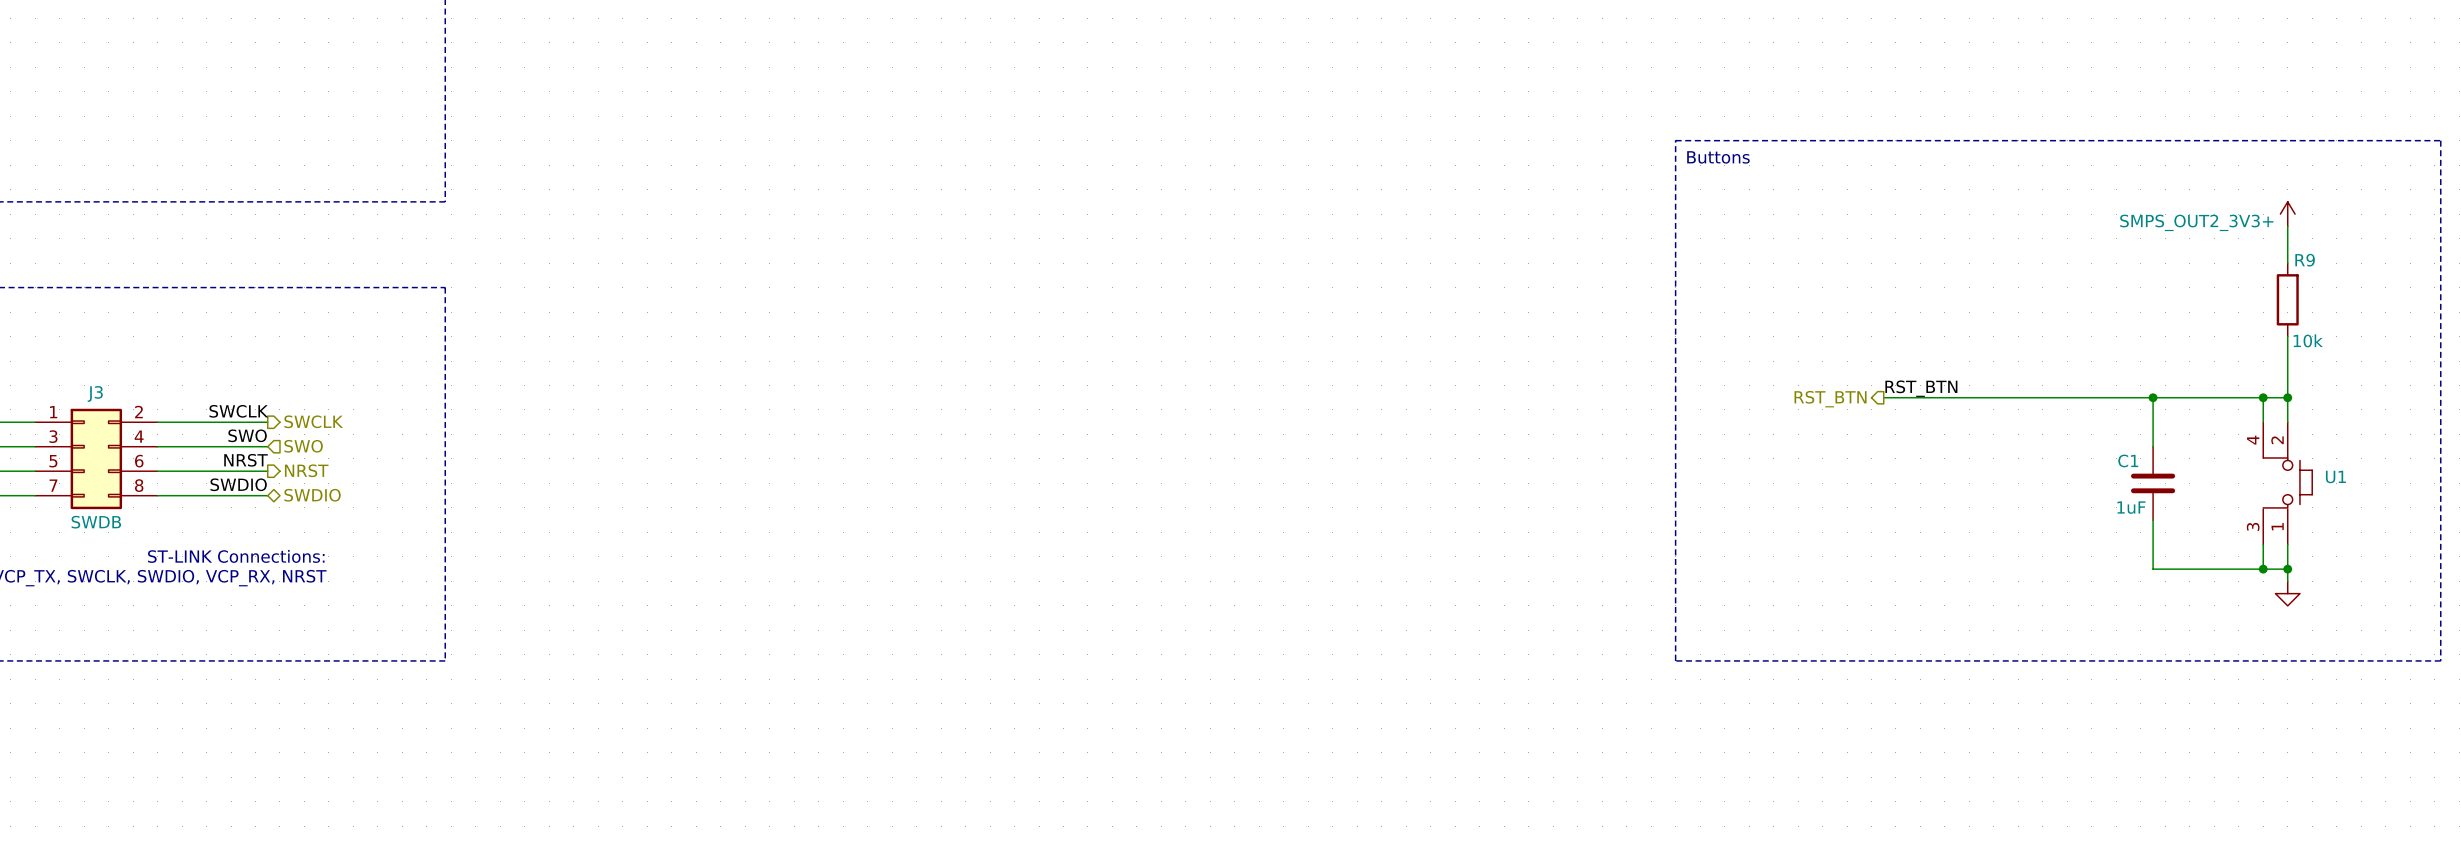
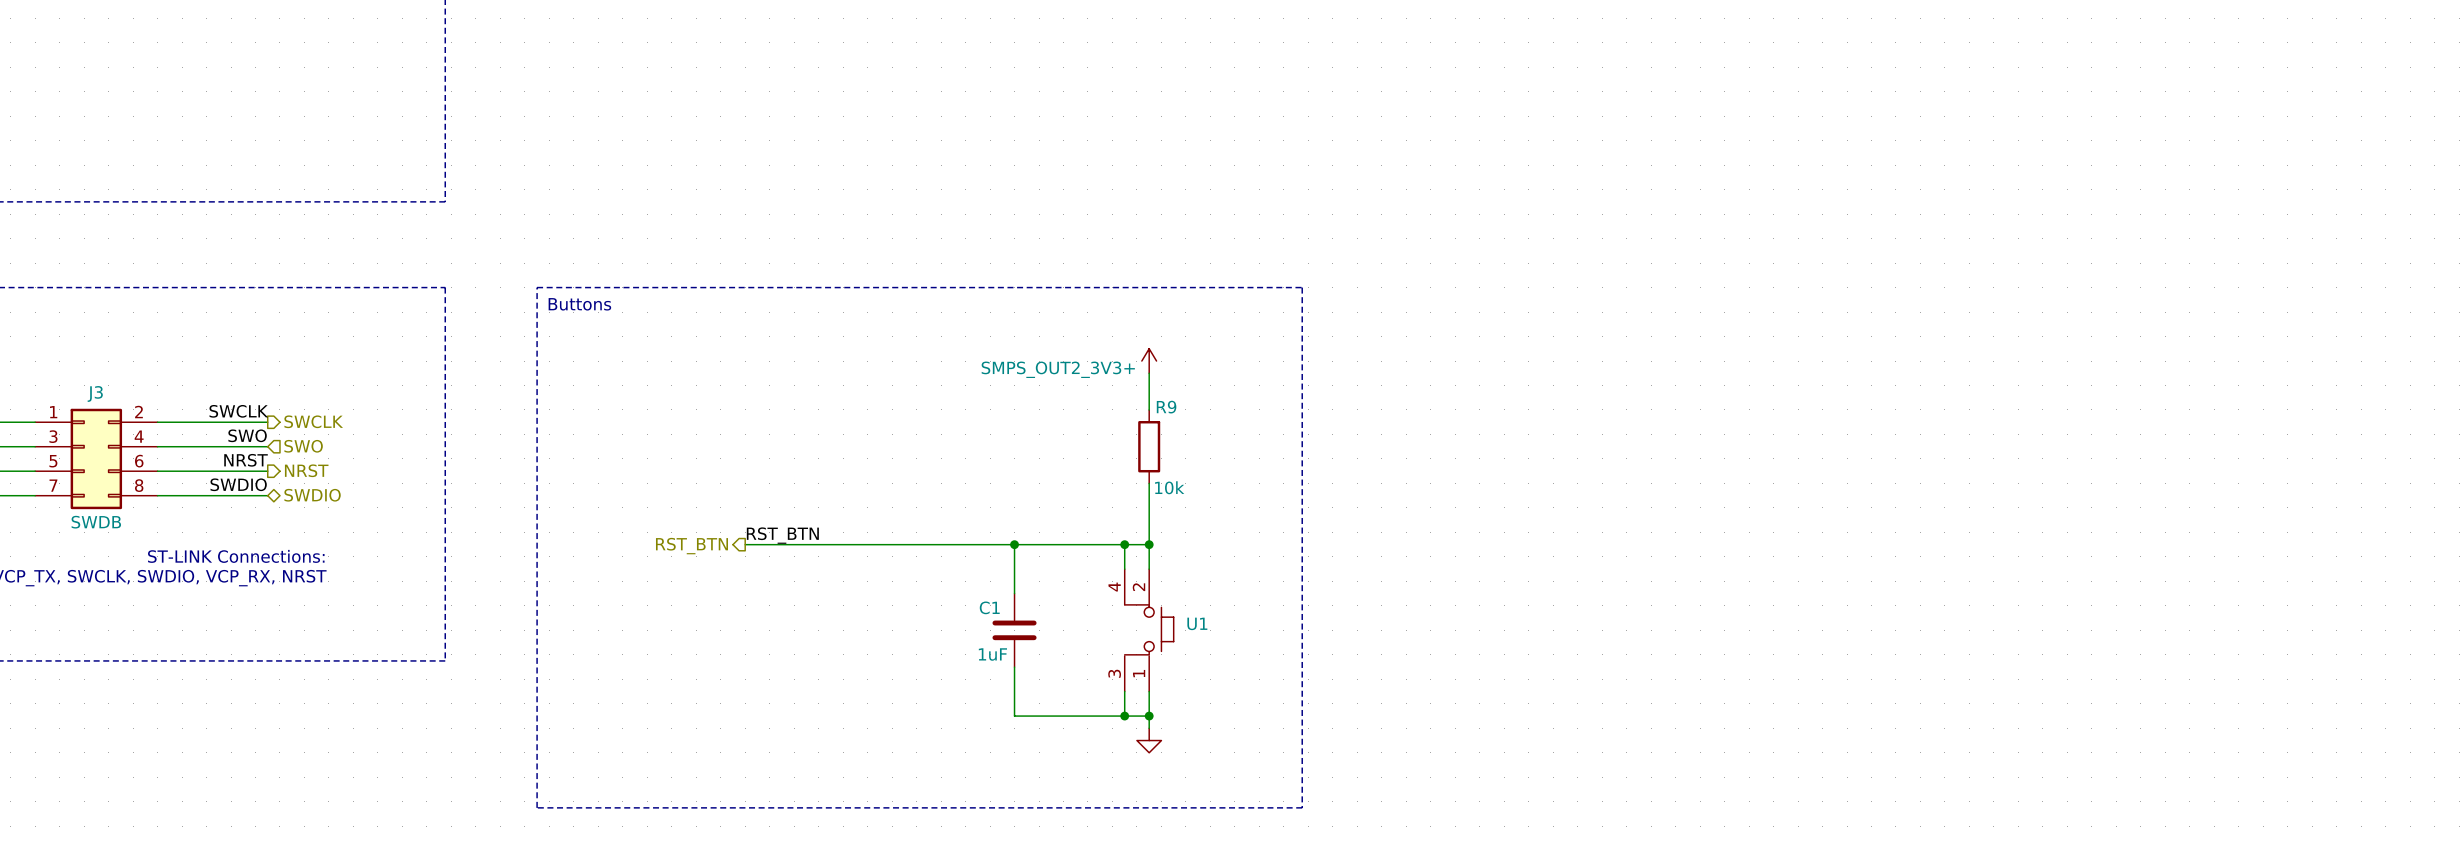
line: (1675, 140) (2440, 140) (2440, 660) (1675, 660) (1675, 140) -> none
text: Buttons (1718, 157) -> none
power symbol: SMPS_OUT2_3V3+ (2287, 214) -> none
wire: (2287, 226) (2287, 263) -> none
line: none -> (537, 287) (1302, 287) (1302, 807) (537, 807) (537, 287)
R9 position: (2287, 299) -> (1149, 446)
text: none -> Buttons (579, 304)
wire: (2287, 336) (2287, 422) -> none
power symbol: none -> SMPS_OUT2_3V3+ (1149, 361)
wire: none -> (1149, 373) (1149, 409)
label: RST_BTN (1921, 388) -> none
wire: (1883, 397) (2287, 397) -> none
wire: (2153, 397) (2153, 446) -> none
junction: (2153, 397) -> none
wire: (2263, 397) (2263, 422) -> none
junction: (2263, 397) -> none
junction: (2287, 397) -> none
hierarchical label: RST_BTN (1830, 399) -> none
wire: none -> (1149, 483) (1149, 569)
C1 position: (2153, 483) -> (1014, 630)
U1 position: (2287, 483) -> (1149, 630)
wire: (2153, 520) (2153, 569) (2287, 569) -> none
label: none -> RST_BTN (782, 535)
wire: none -> (745, 544) (1149, 544)
wire: none -> (1014, 544) (1014, 593)
junction: none -> (1014, 544)
wire: none -> (1124, 544) (1124, 569)
junction: none -> (1124, 544)
junction: none -> (1149, 544)
wire: (2263, 544) (2263, 569) -> none
wire: (2287, 544) (2287, 581) -> none
hierarchical label: none -> RST_BTN (691, 546)
junction: (2263, 569) -> none
junction: (2287, 569) -> none
power symbol: (2287, 593) -> none
wire: none -> (1014, 667) (1014, 716) (1149, 716)
wire: none -> (1124, 691) (1124, 716)
wire: none -> (1149, 691) (1149, 728)
junction: none -> (1124, 716)
junction: none -> (1149, 716)
power symbol: none -> (1149, 740)

